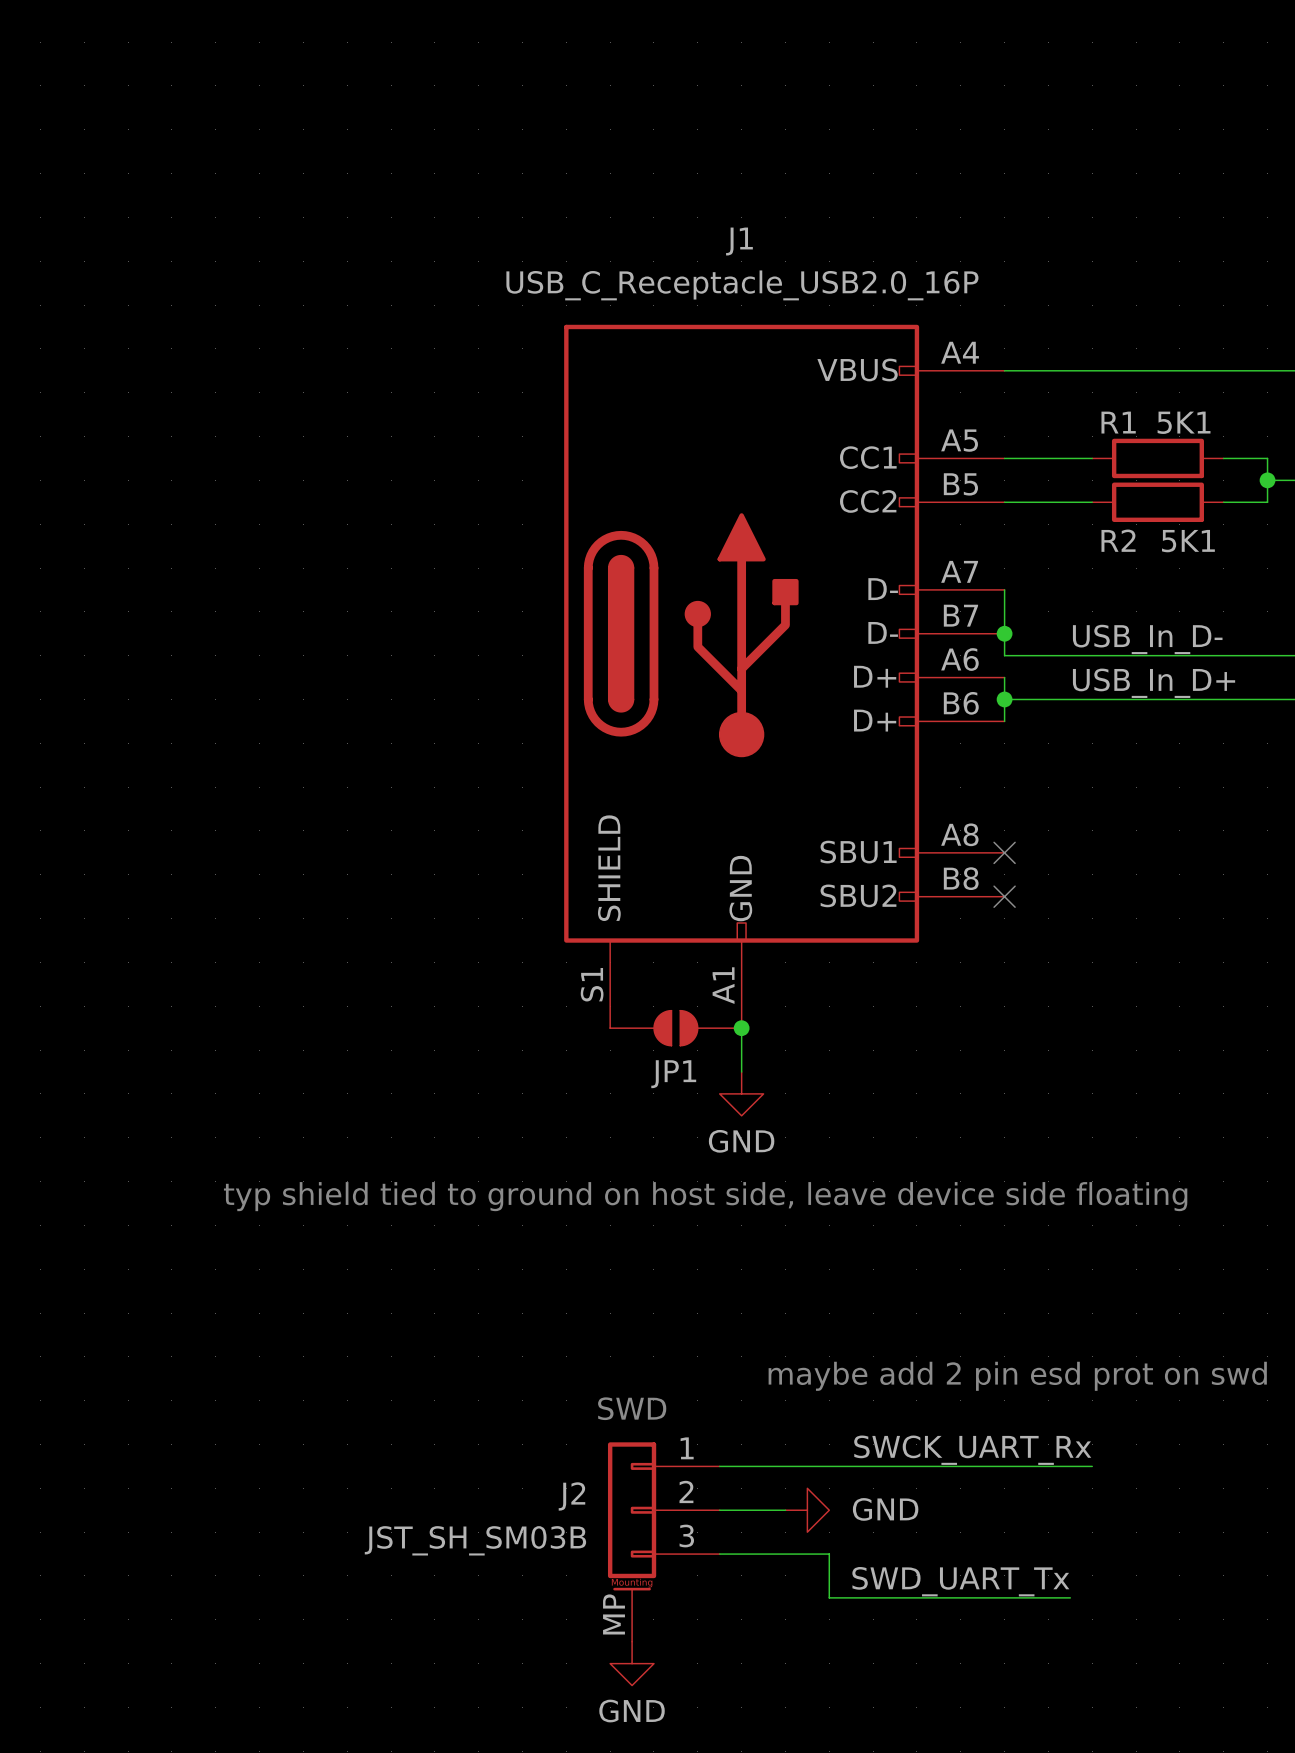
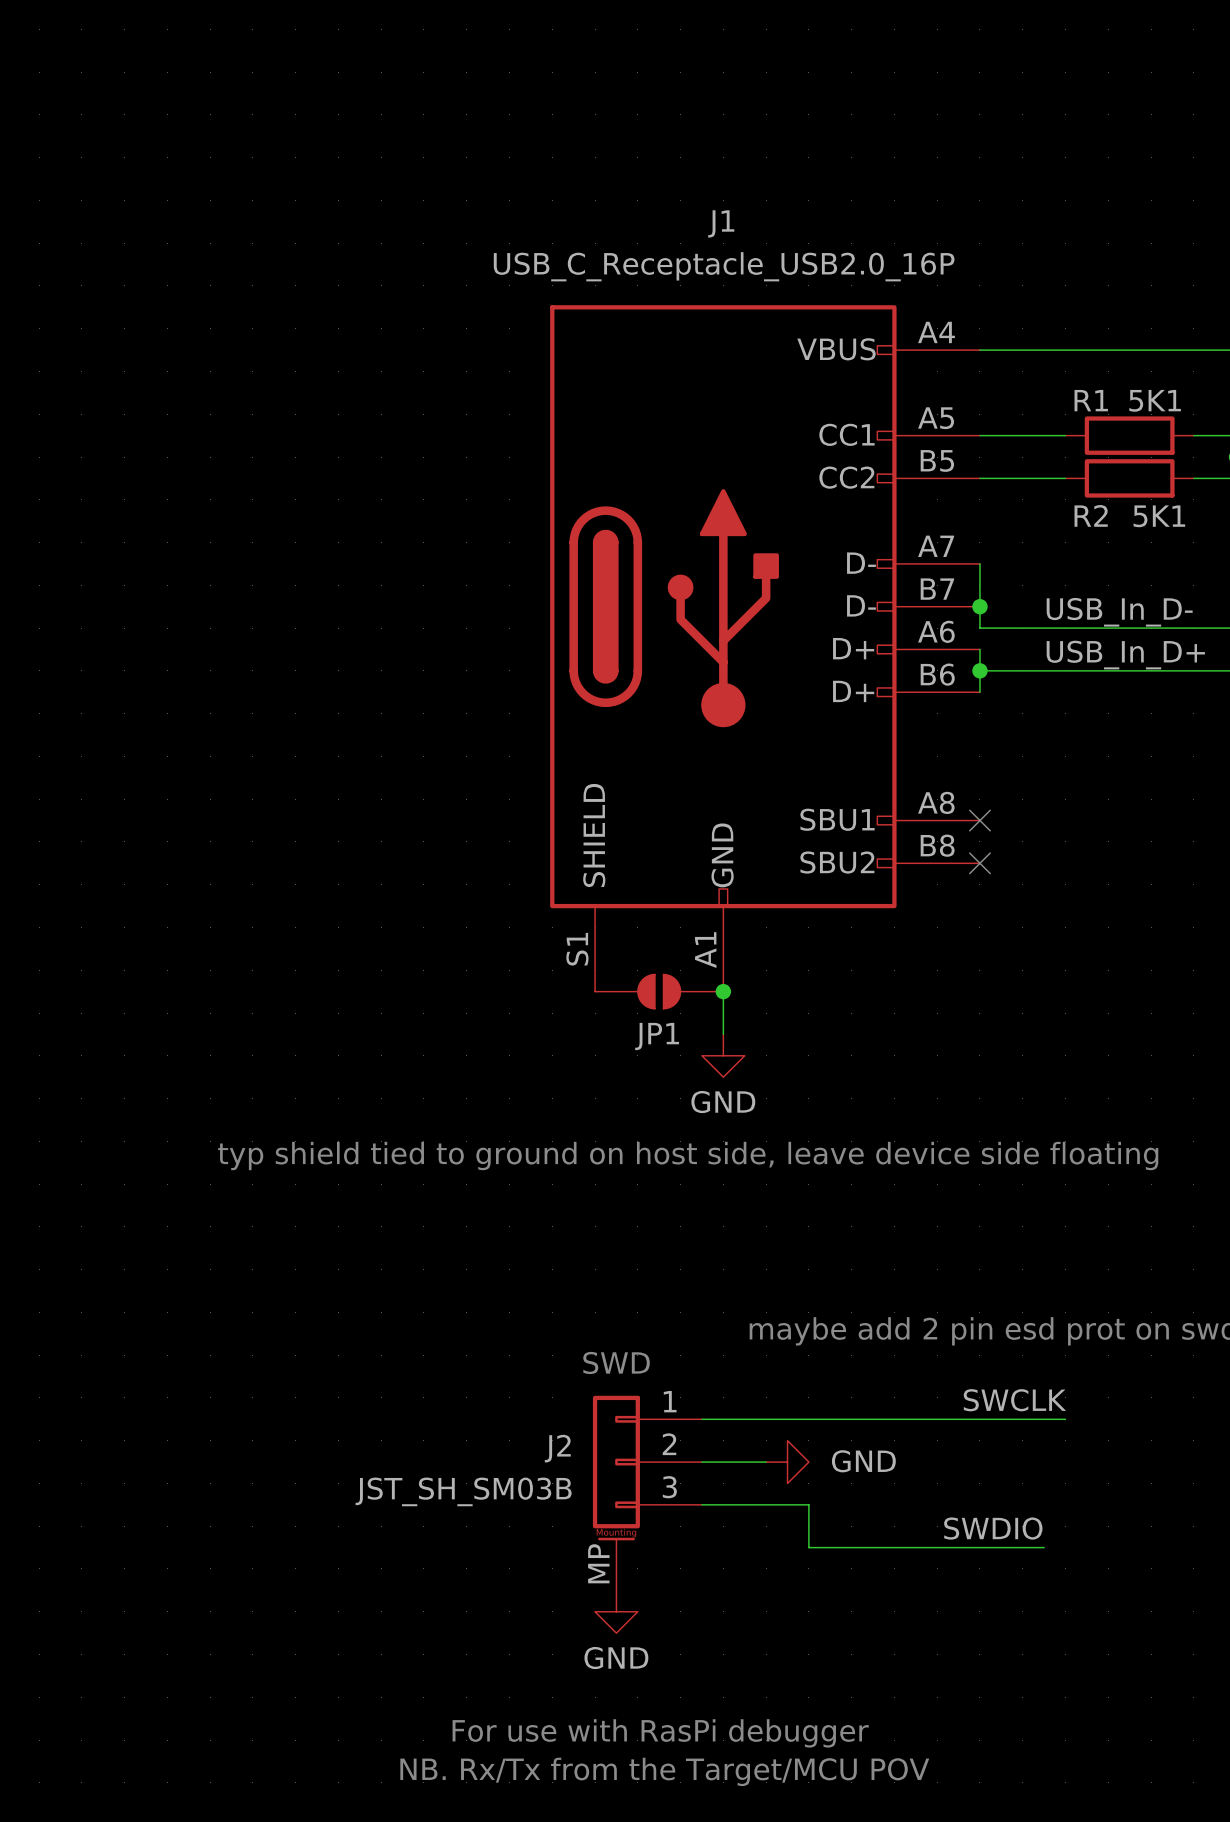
label: SWCK_UART_Rx (972, 1450) -> SWCLK (1014, 1400)
label: SWD_UART_Tx (960, 1581) -> SWDIO (993, 1528)

